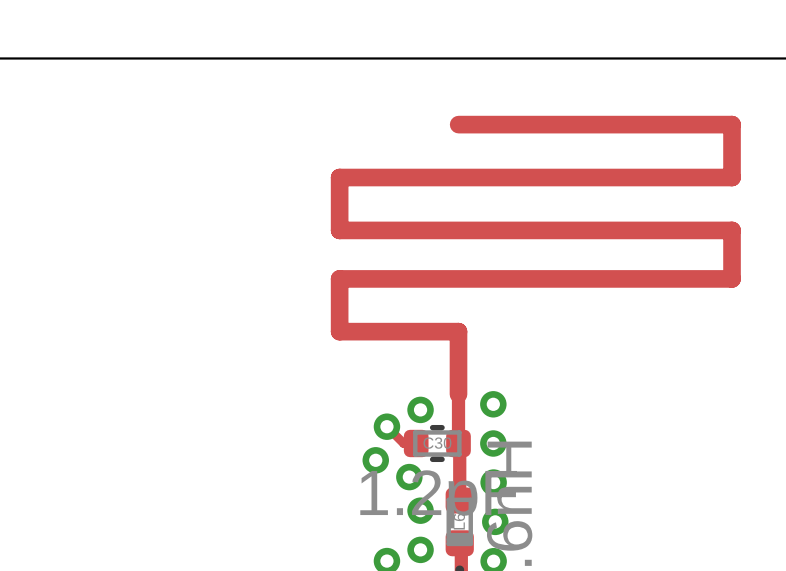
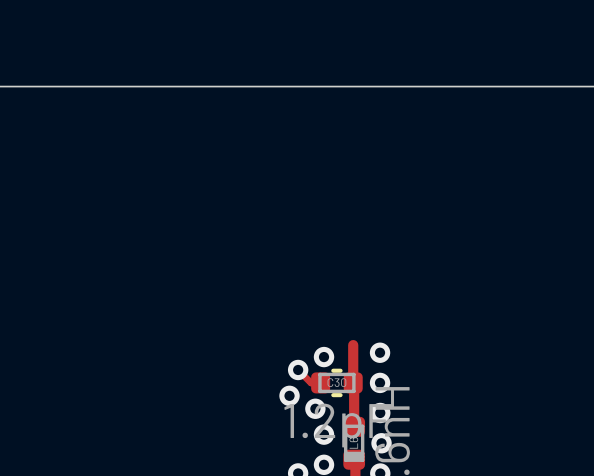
top track: (458, 124) (732, 124) (732, 177) (339, 177) (339, 230) (732, 230) (732, 278) (339, 278) (339, 331) (458, 331) (458, 394) -> none

